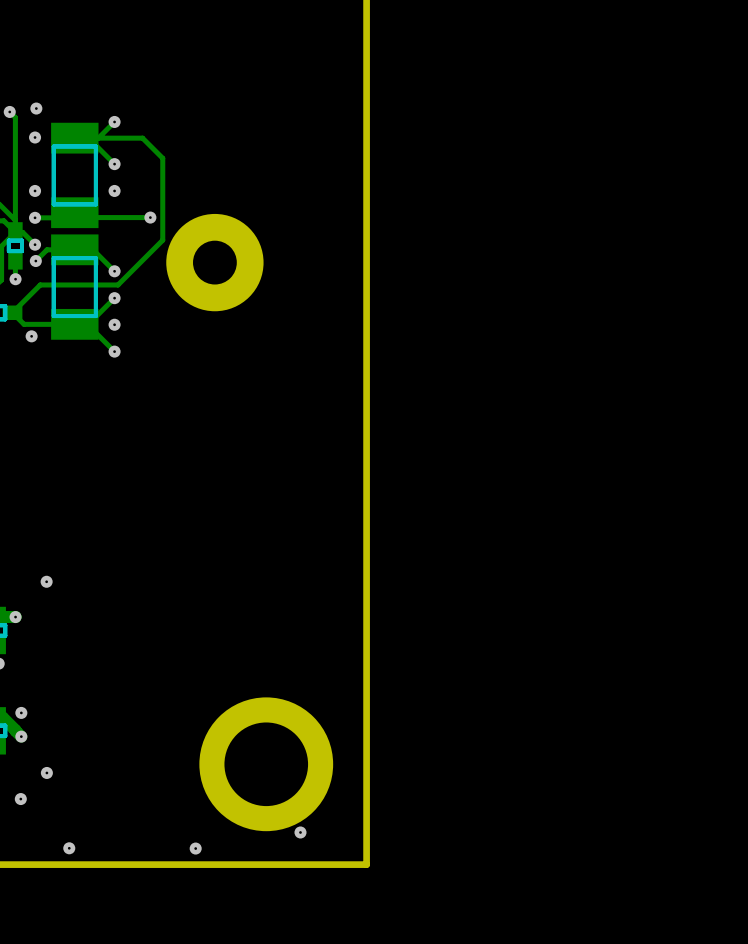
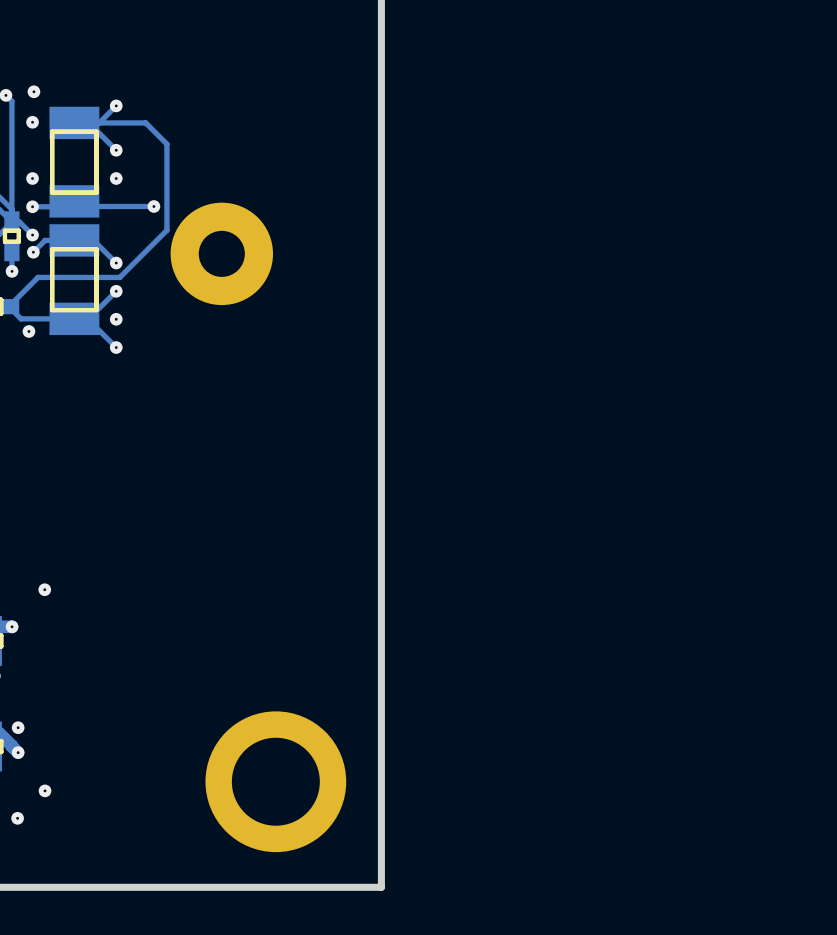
via: (300, 832) -> none
via: (69, 848) -> none
via: (195, 848) -> none

